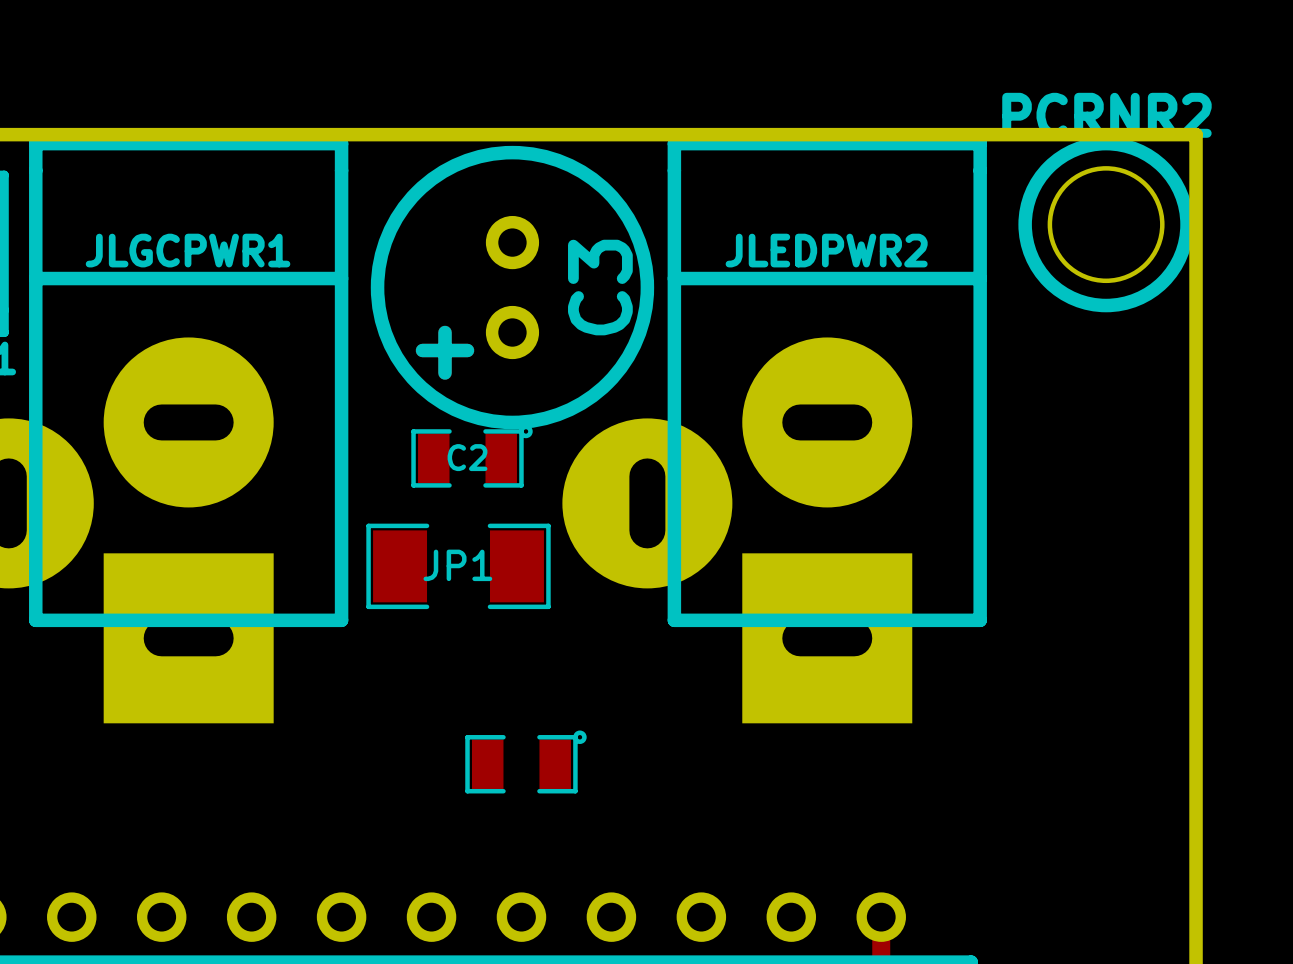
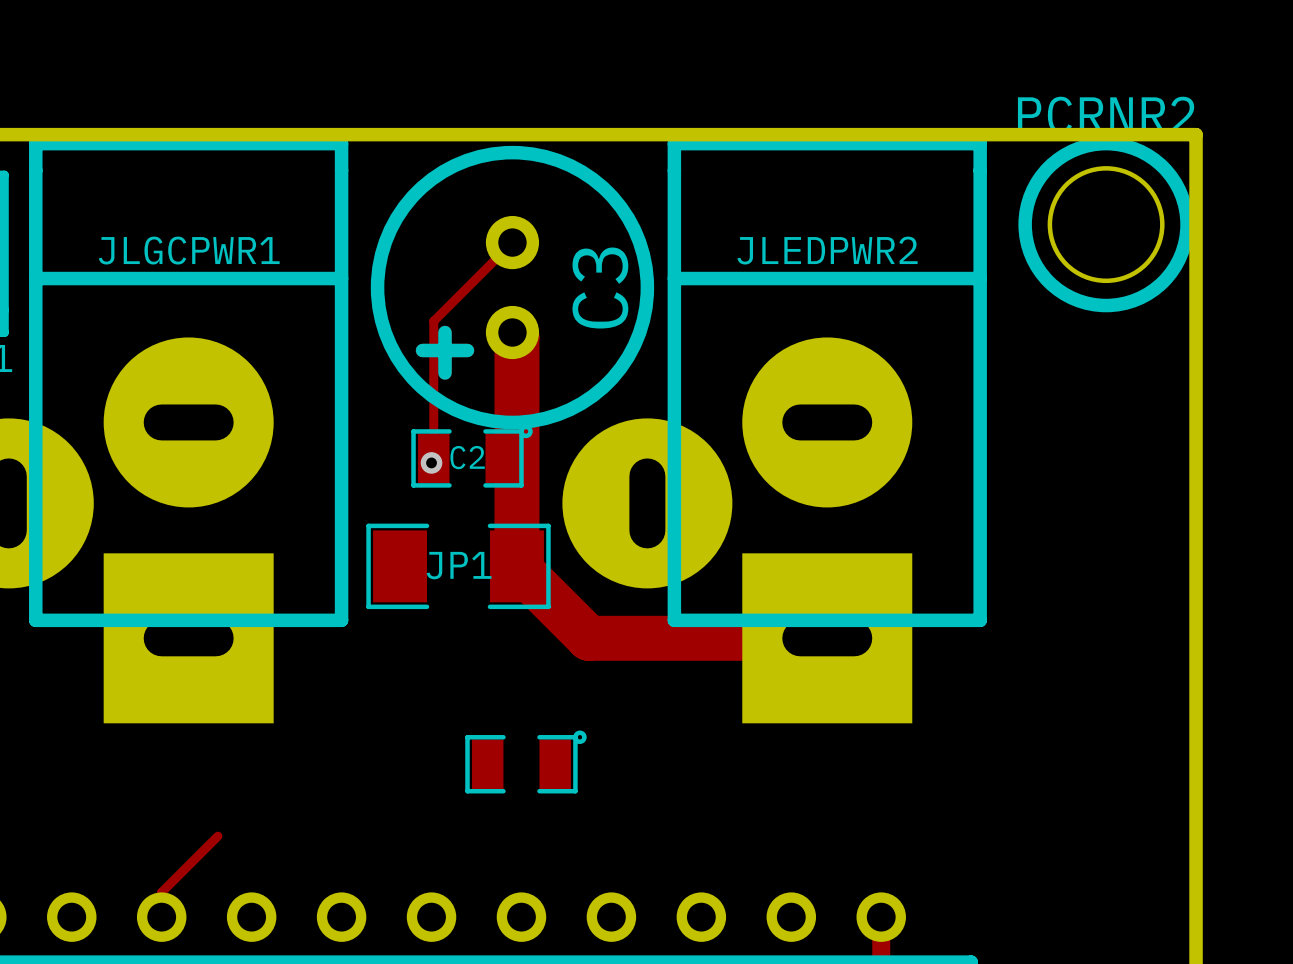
track: none -> (512, 242) (433, 321) (433, 460) (431, 462)
track: none -> (512, 332) (516, 337) (516, 566) (588, 638) (827, 638)
via: none -> (431, 462)
track: none -> (217, 836) (161, 892) (161, 917)

